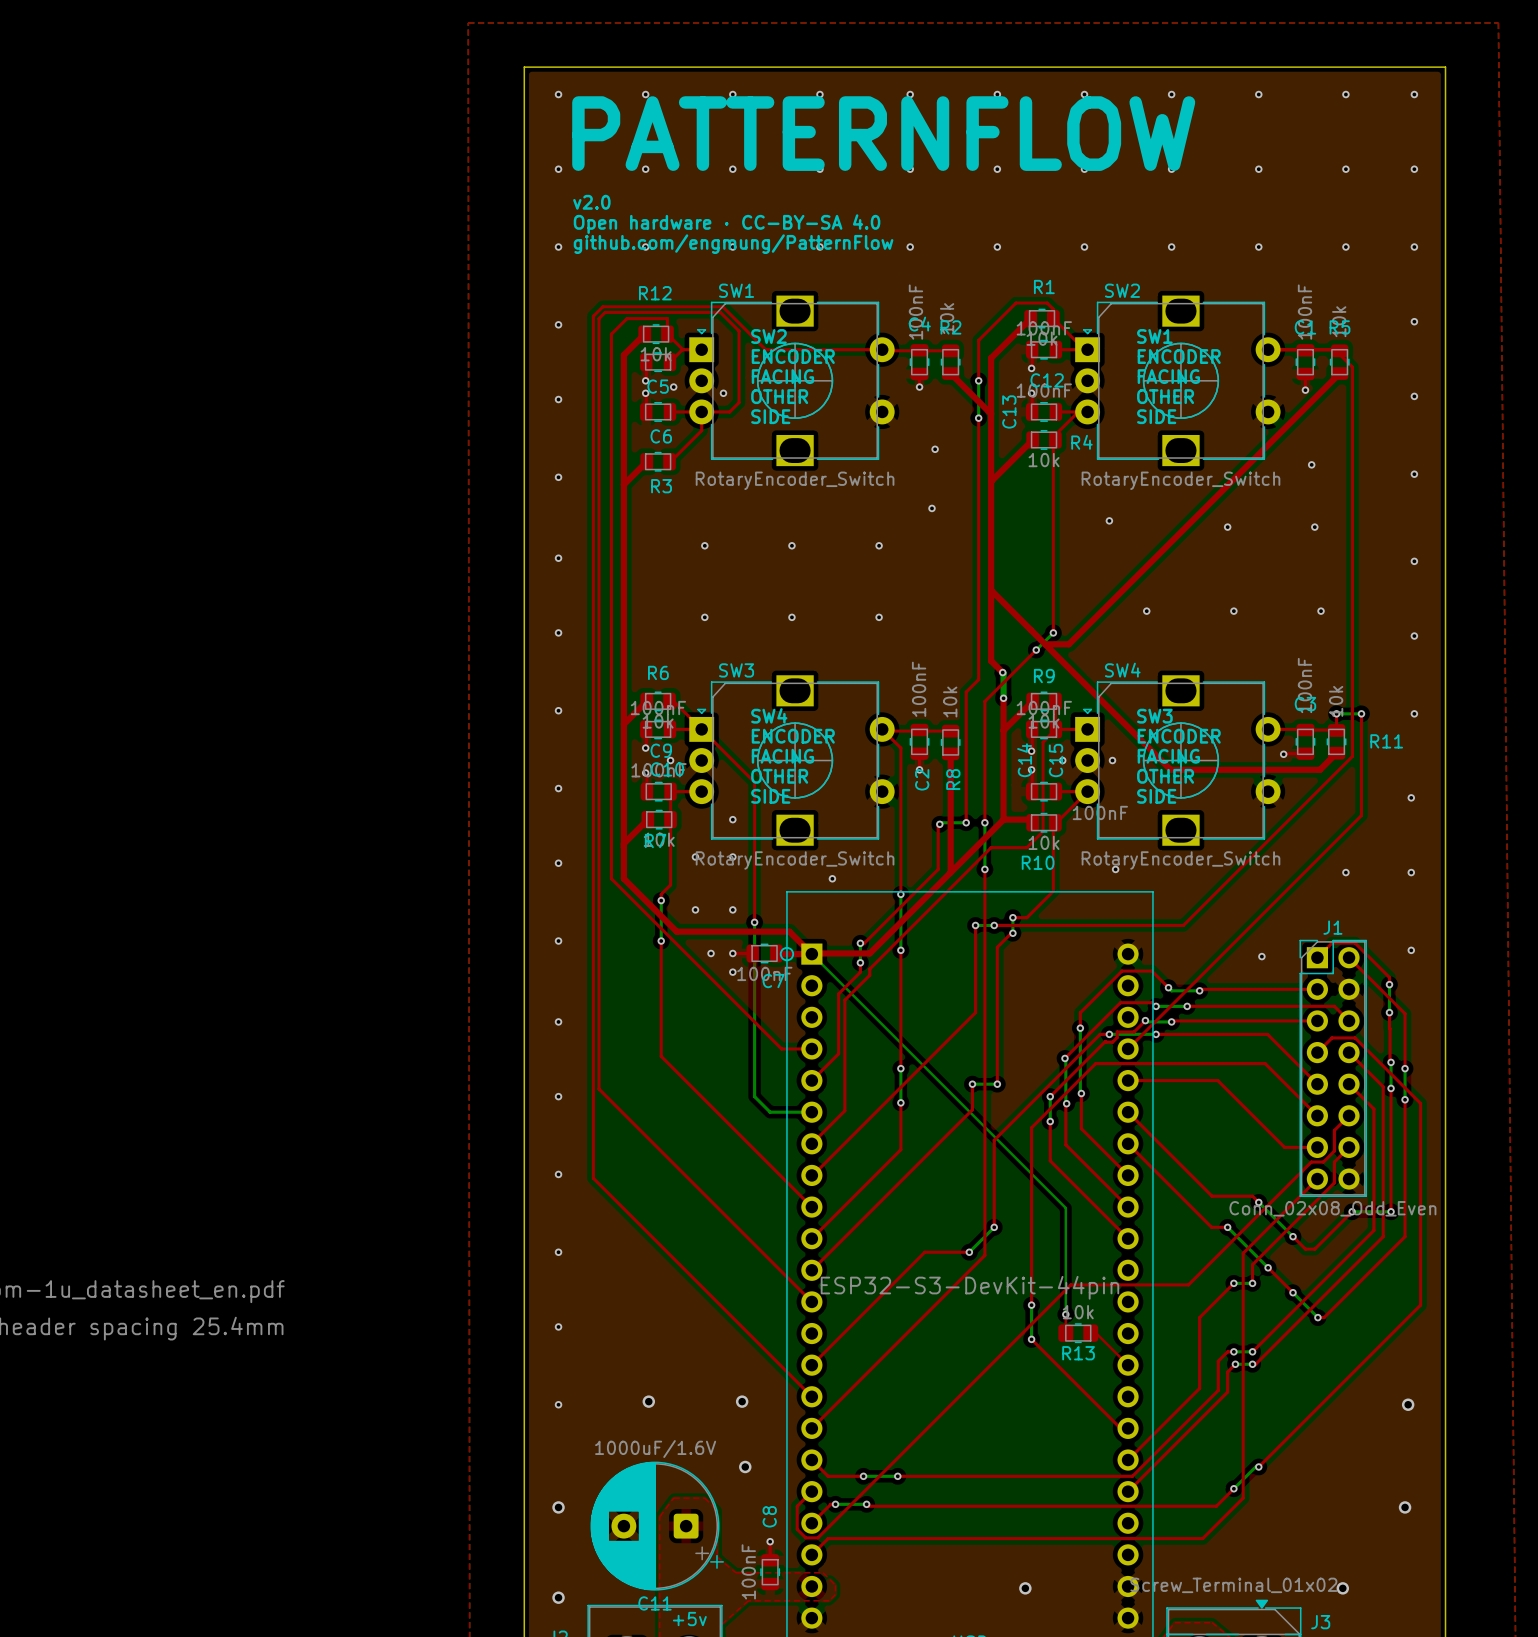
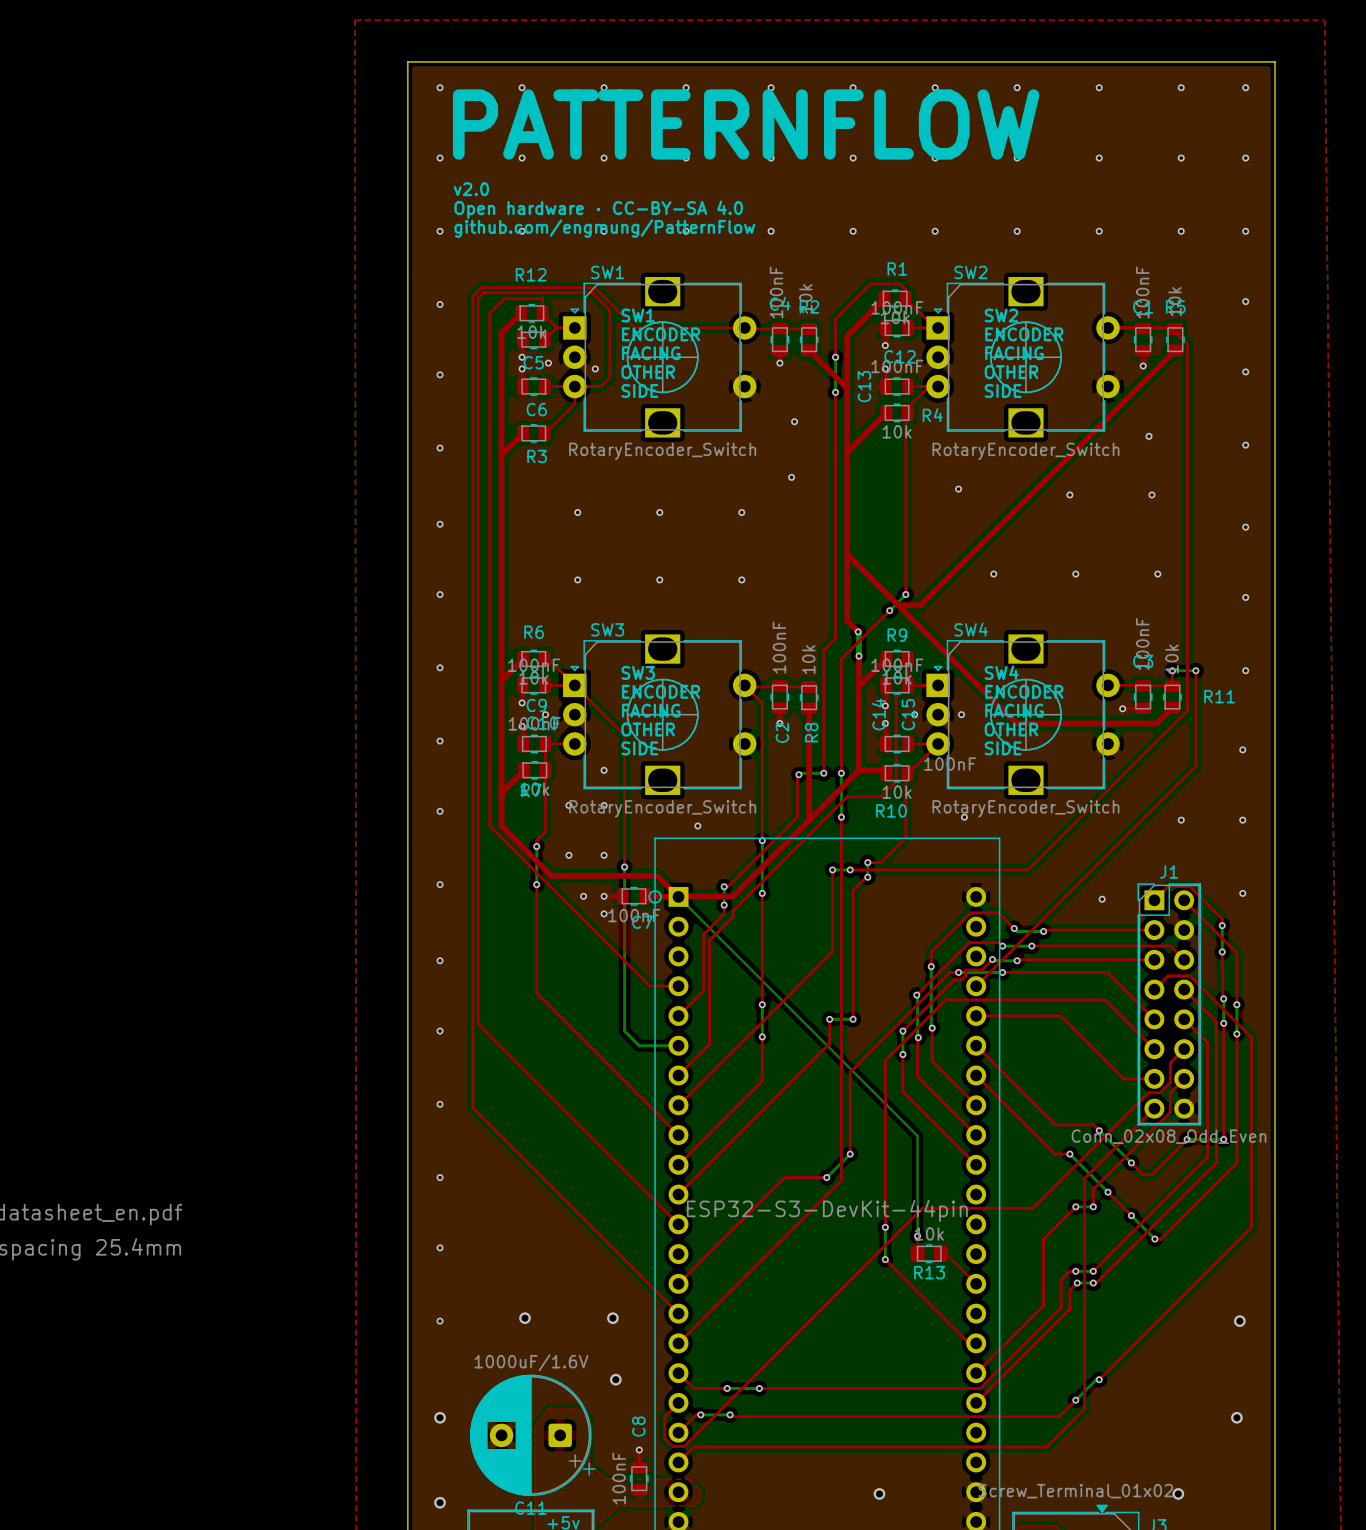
text: SW2 (768, 336) -> SW1 (638, 315)
text: SW1 (1154, 336) -> SW2 (1001, 315)
text: SW4 (769, 715) -> SW3 (638, 672)
text: SW3 (1154, 716) -> SW4 (1001, 672)

